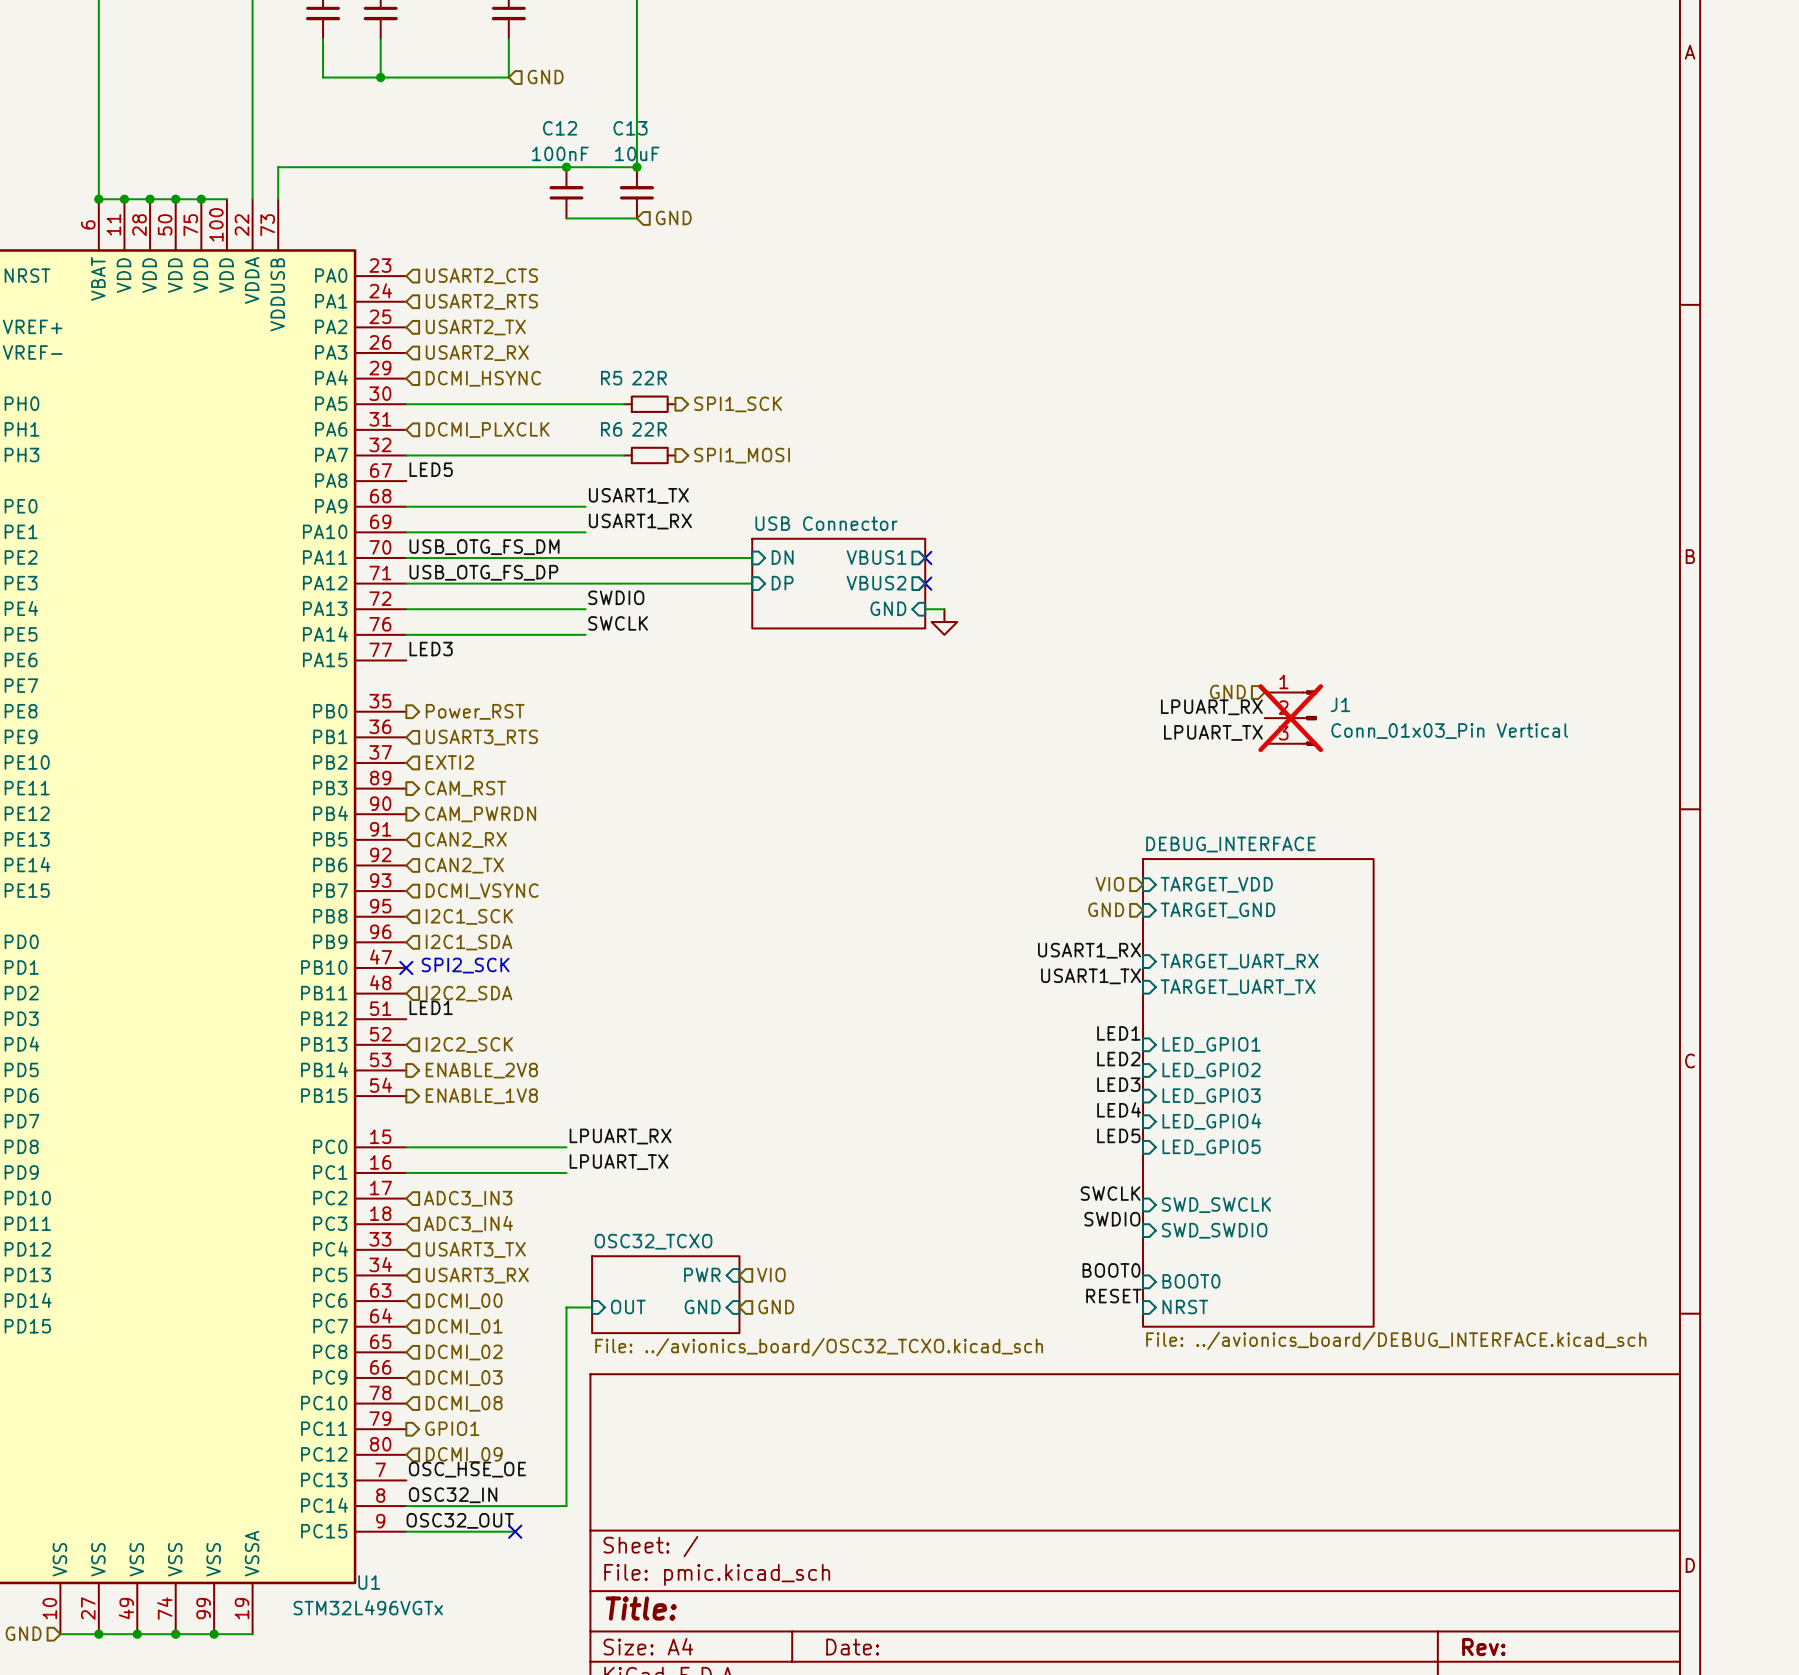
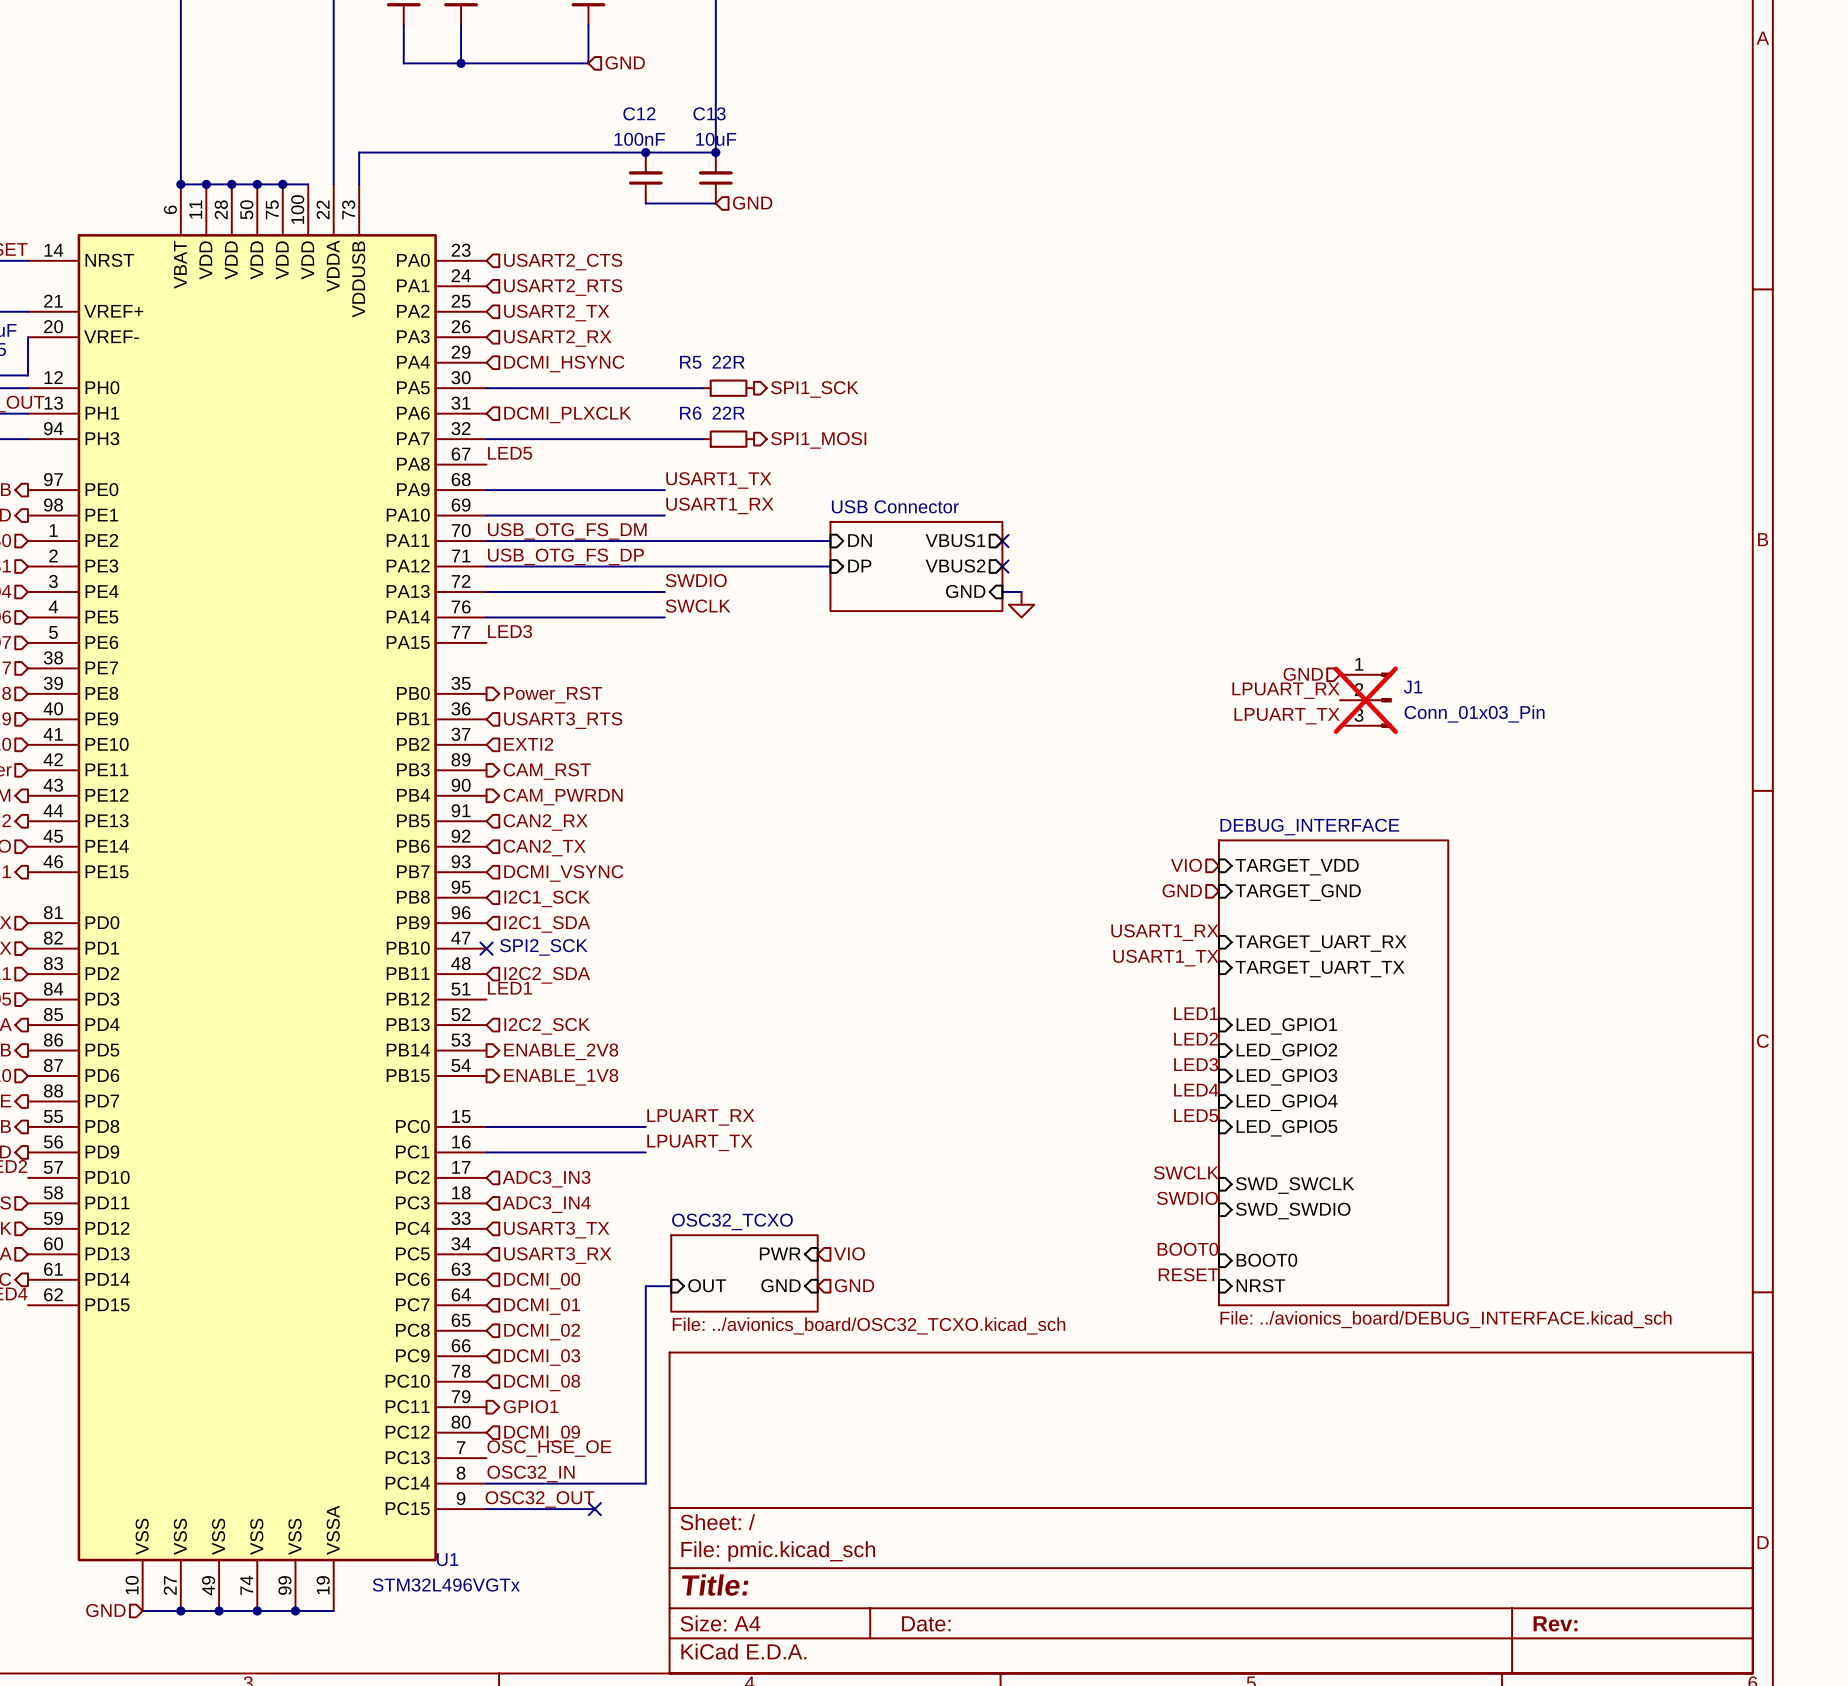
J1 value: Conn_01x03_Pin Vertical (1449, 731) -> Conn_01x03_Pin (1474, 714)

